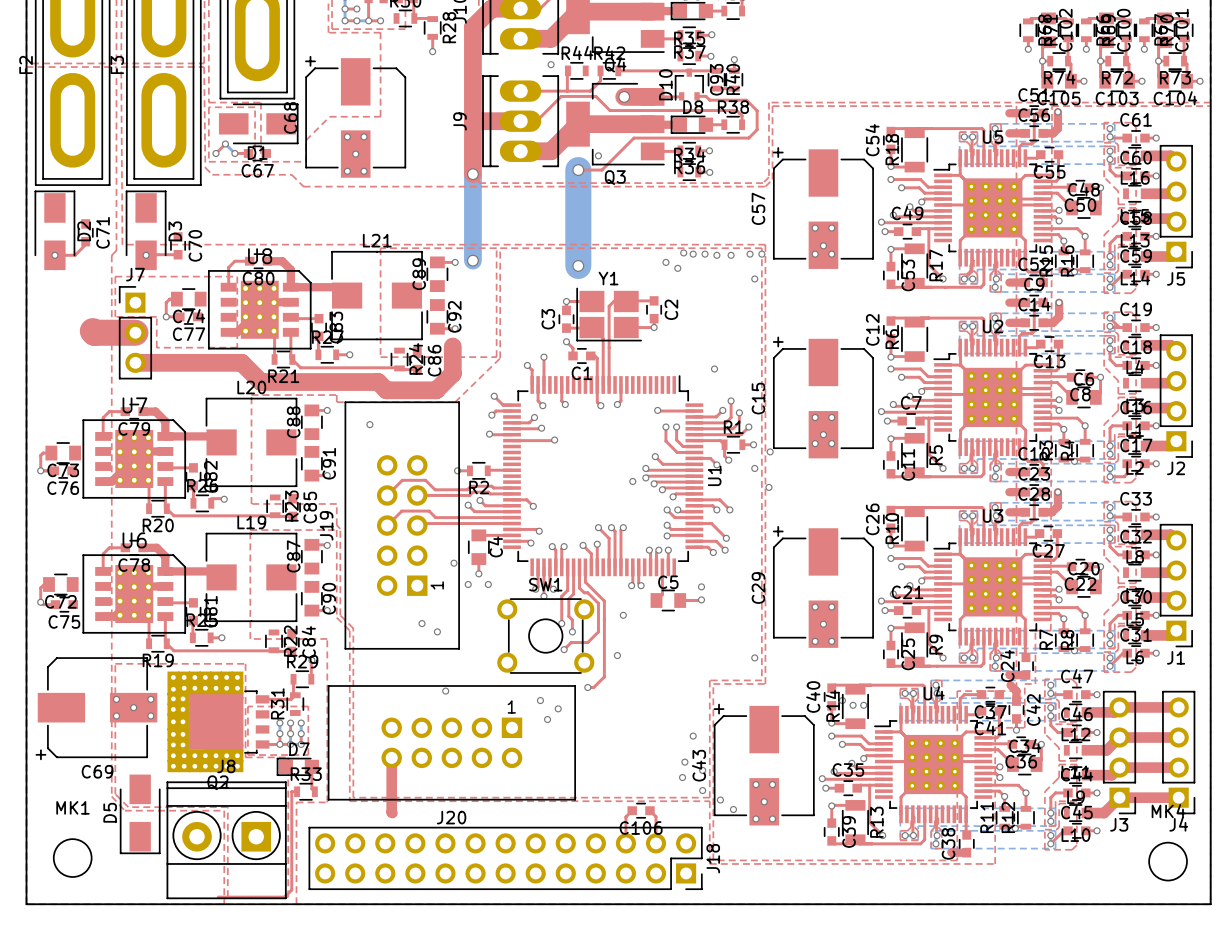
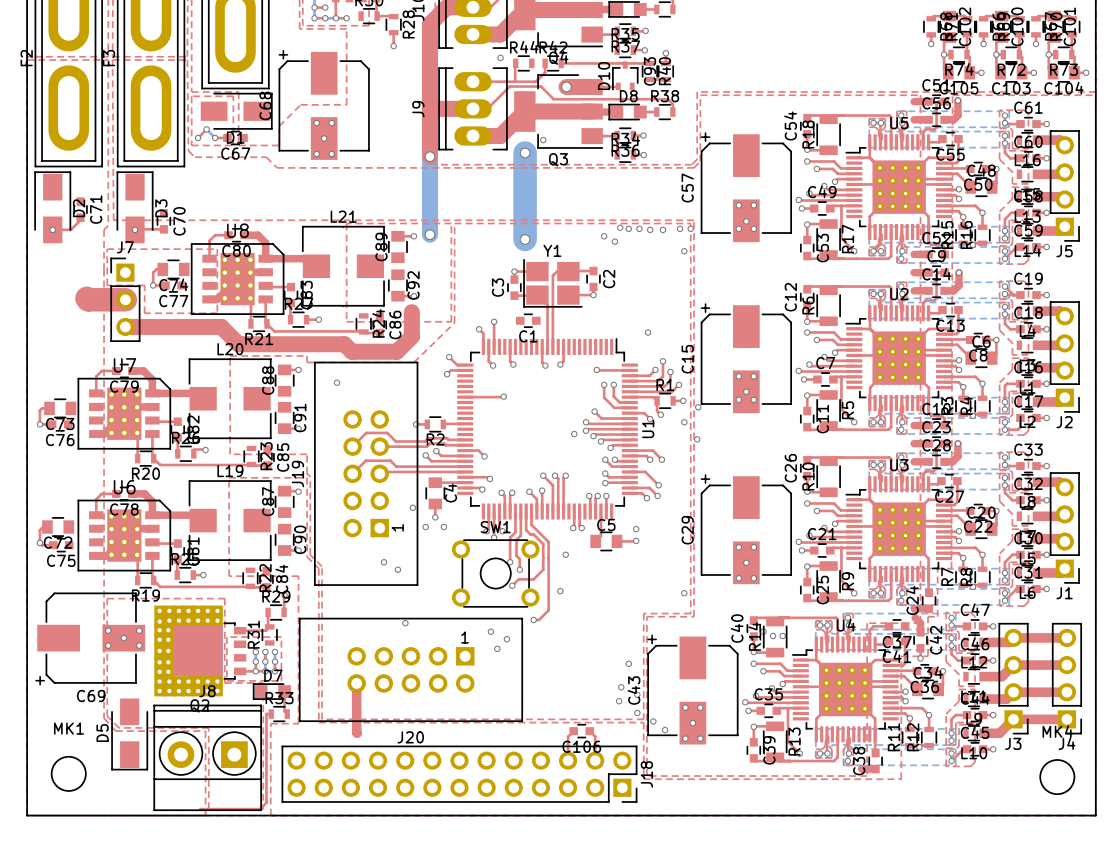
top track: (697, 96) (705, 96) (709, 100) (746, 100) (757, 110) (757, 129) (748, 138) (633, 138) (602, 170) (578, 170) -> none
top track: (566, 341) (573, 348) (573, 355) -> none
via: (566, 341) -> none
top track: (590, 355) (597, 358) (597, 384) -> none
top track: (534, 417) (529, 422) (512, 422) -> none
via: (534, 417) -> none
top track: (541, 428) (512, 428) -> none
via: (541, 428) -> none
top track: (489, 434) (512, 434) -> none
via: (489, 434) -> none

